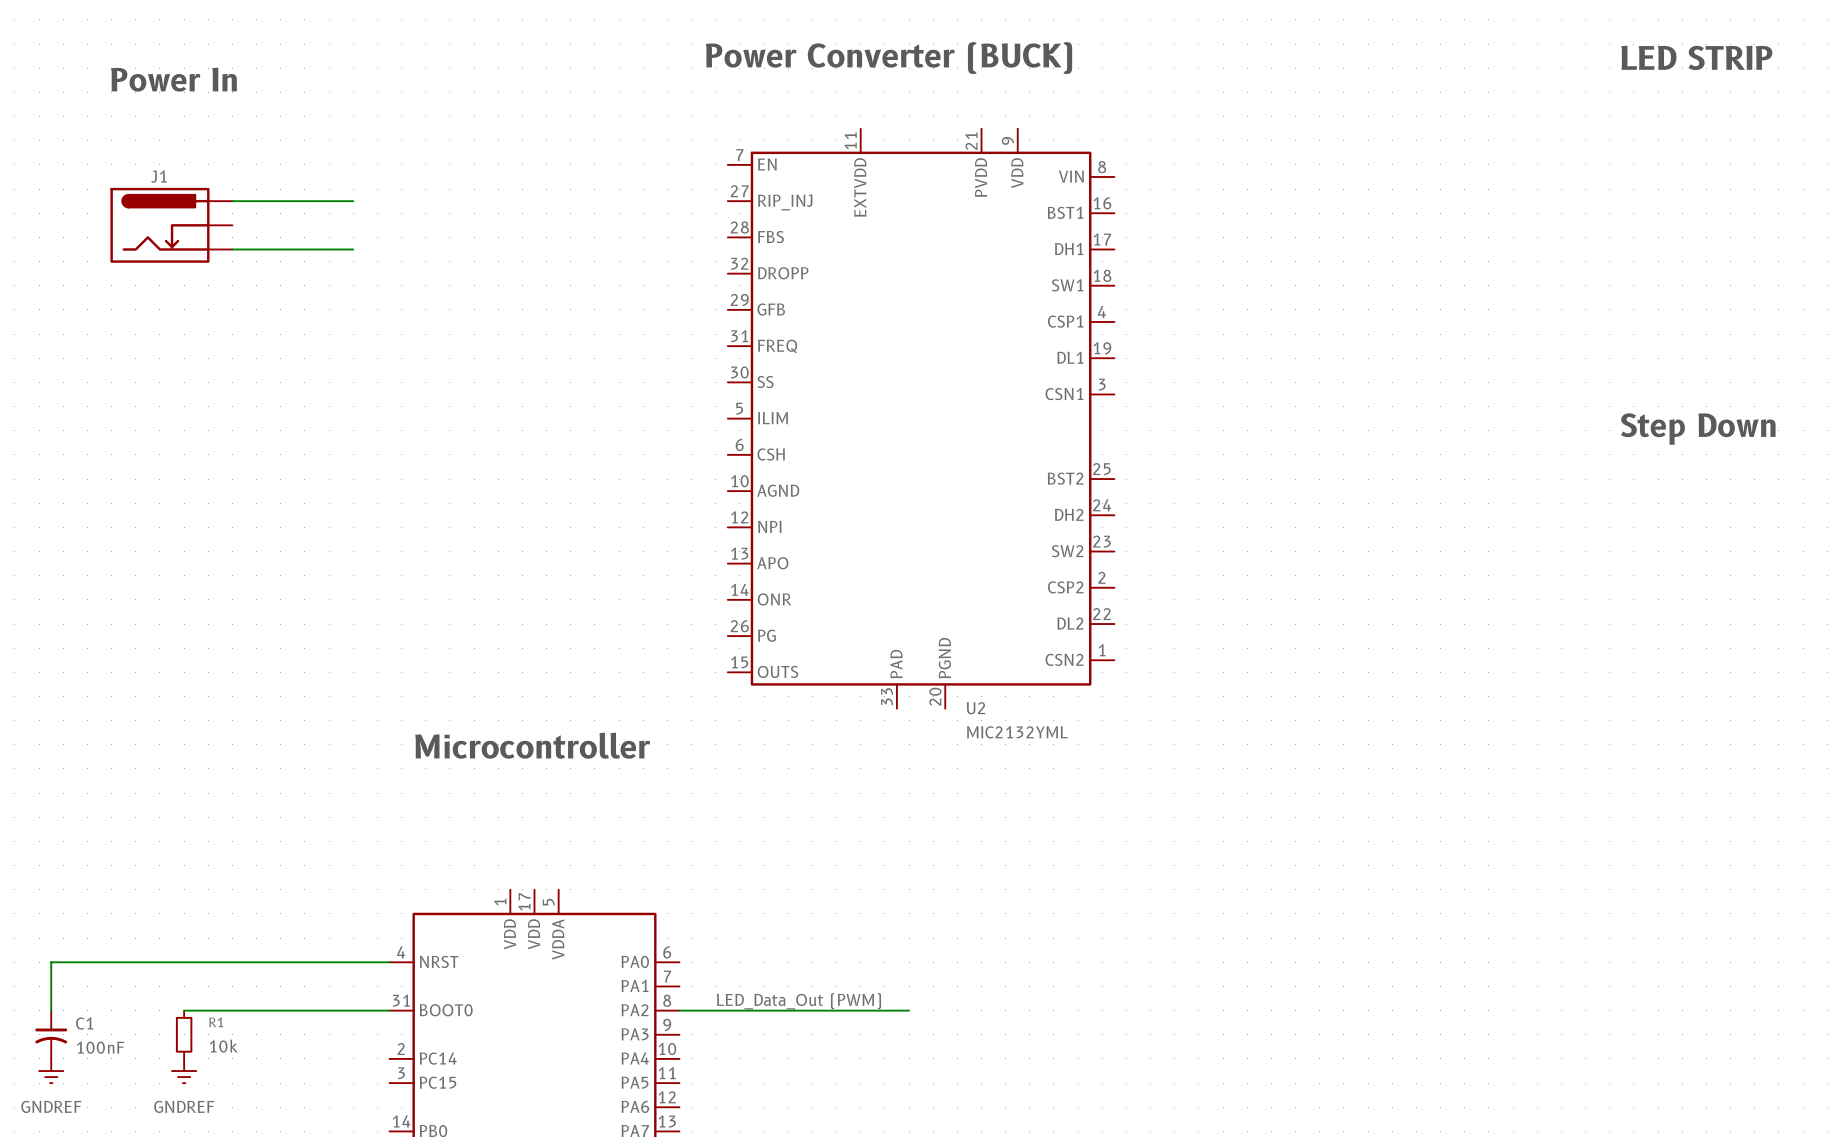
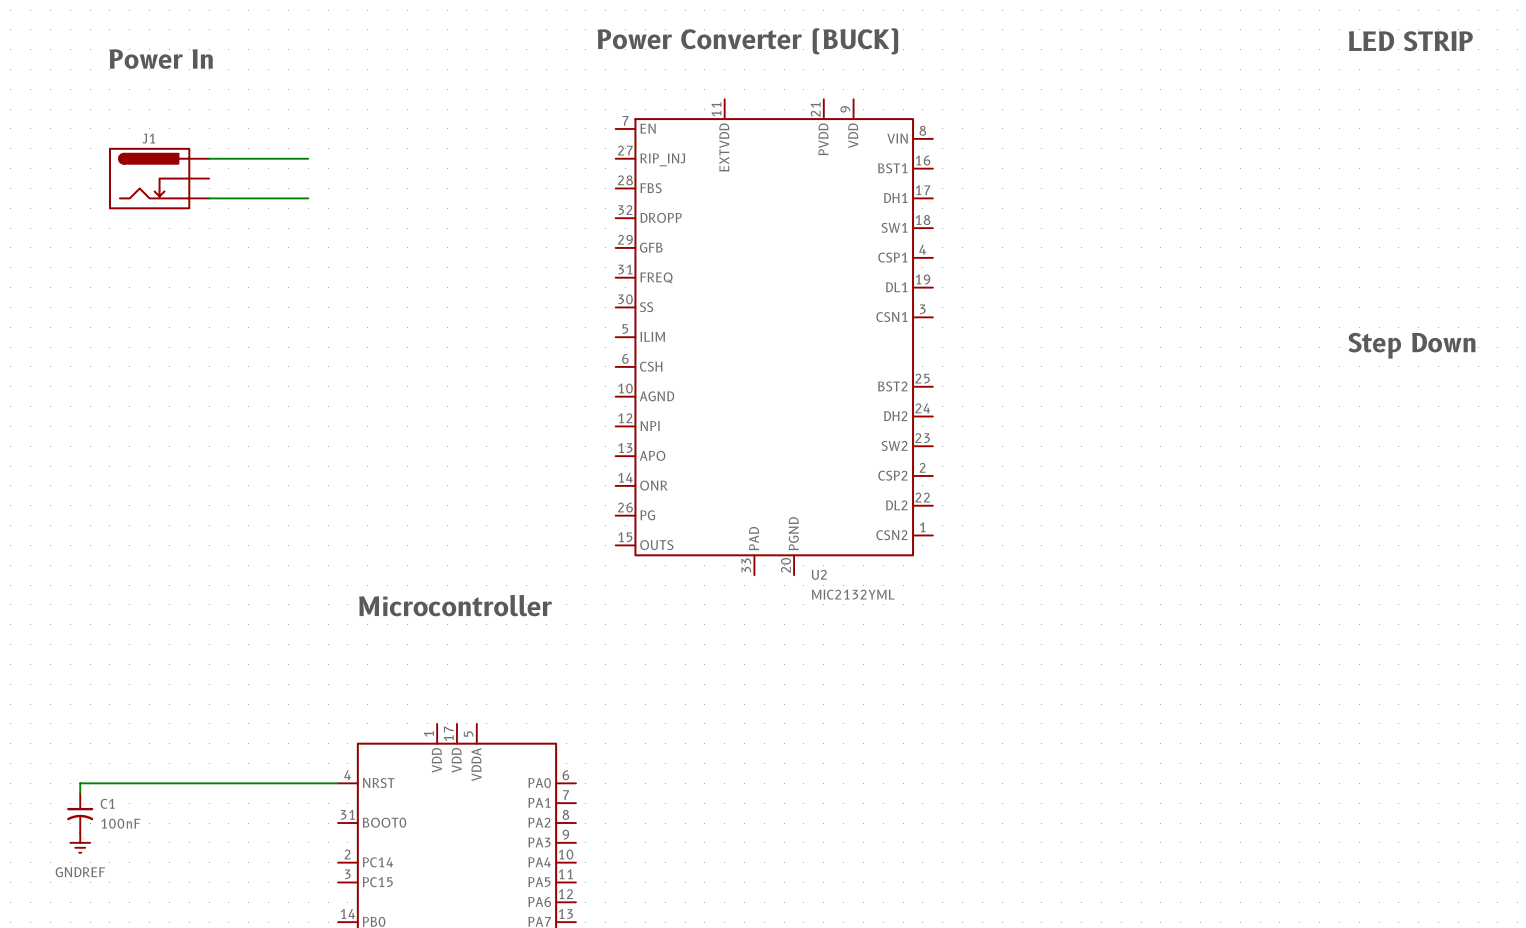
wire: (75, 962) (51, 962) (51, 1010) -> (80, 783) (80, 793)
label: LED_Data_Out (PWM) (799, 1001) -> none
wire: (184, 1010) (389, 1010) -> none
wire: (679, 1010) (909, 1010) -> none
C1 position: (51, 1034) -> (80, 813)
R1: 10k (184, 1034) -> none
power symbol position: GNDREF (51, 1071) -> GNDREF (80, 842)
power symbol: GNDREF (184, 1071) -> none

